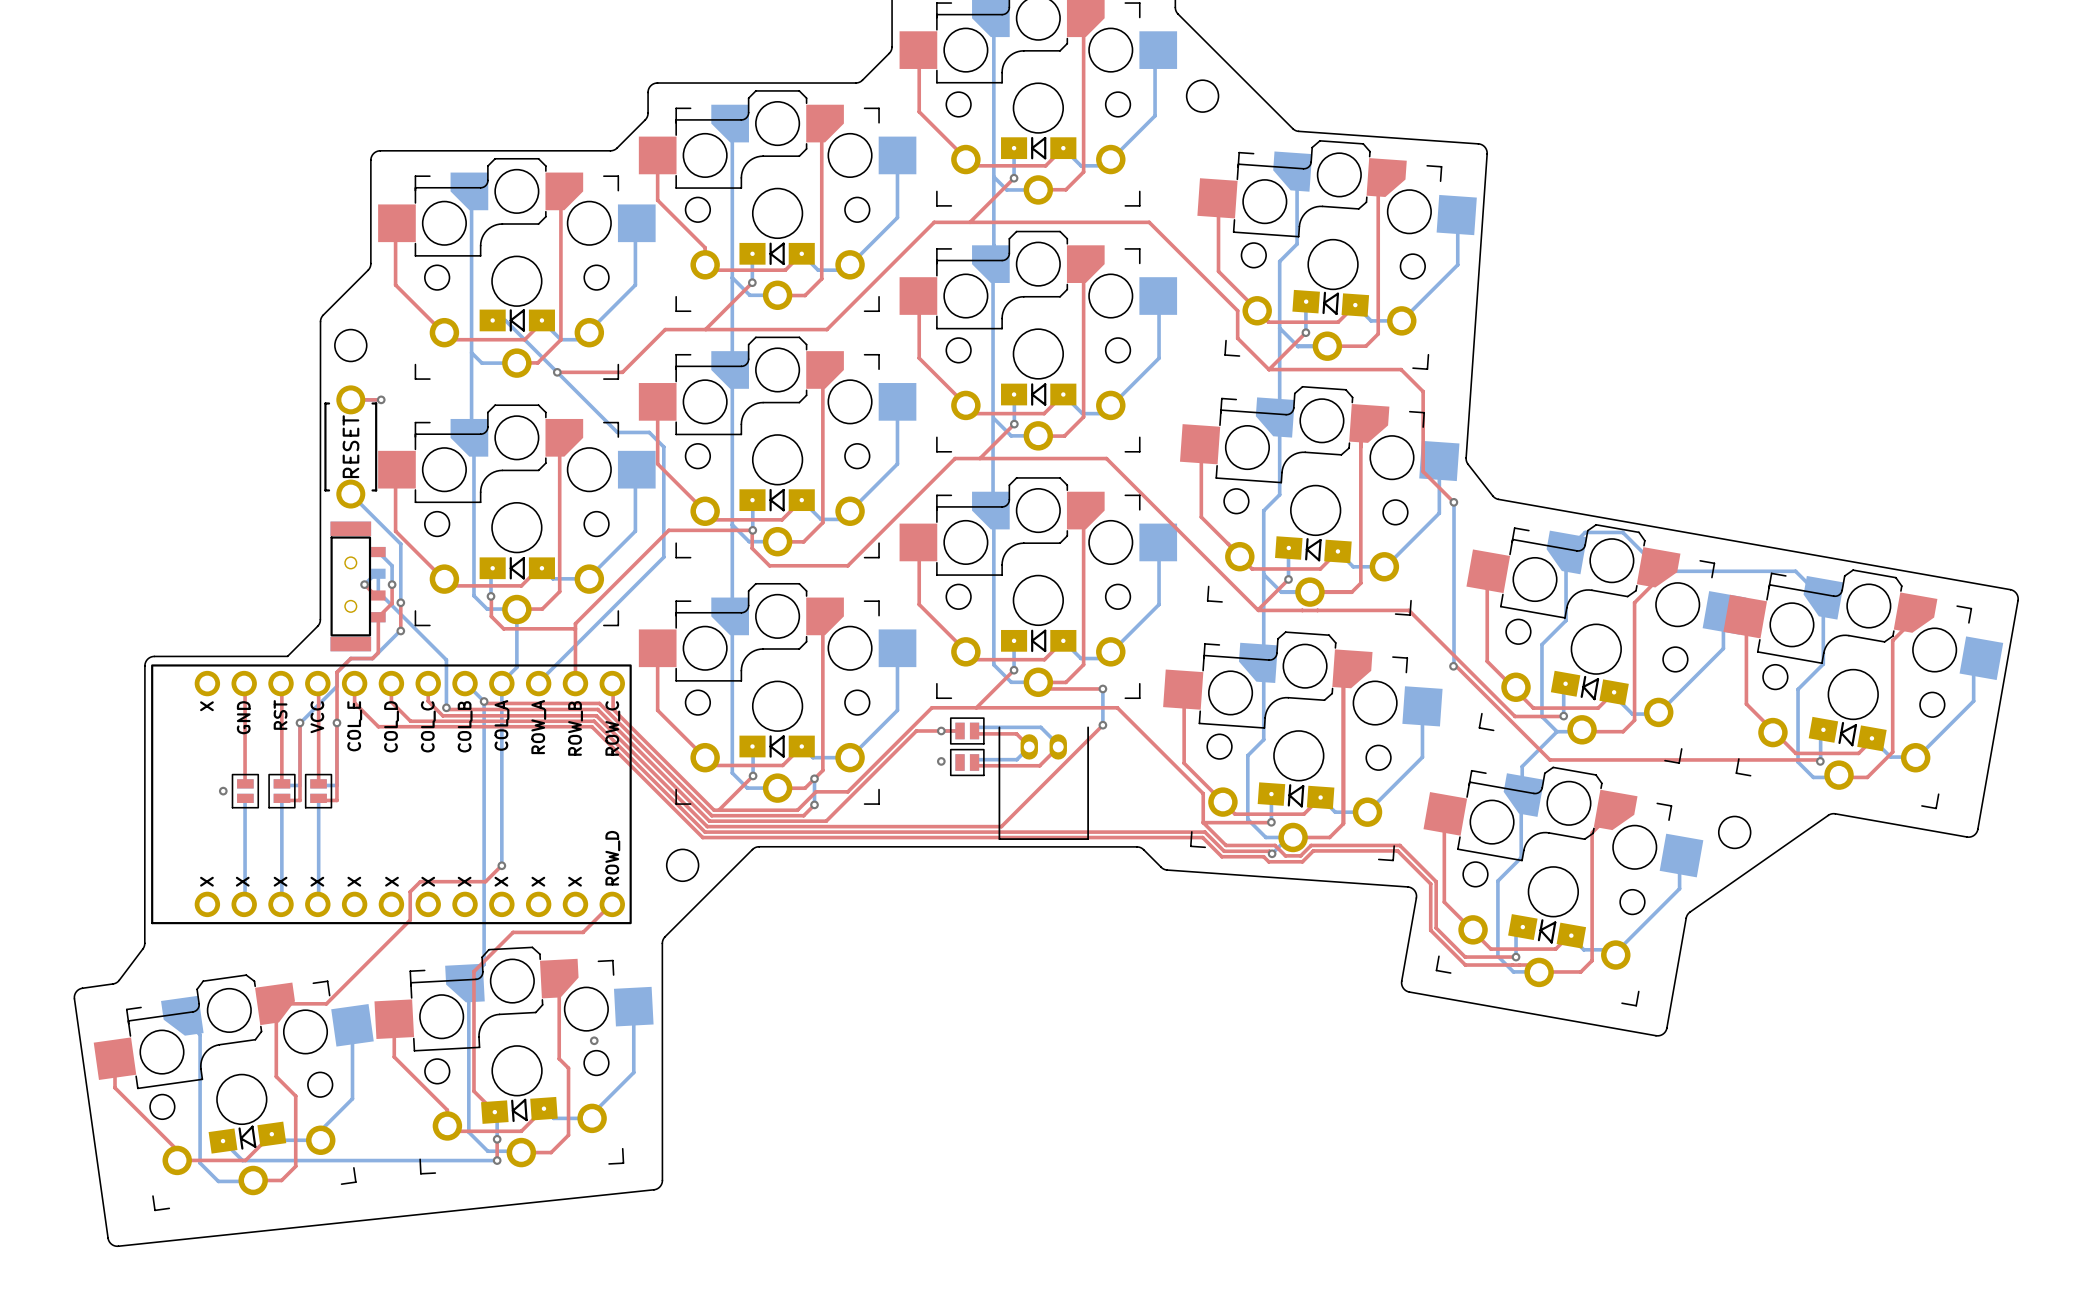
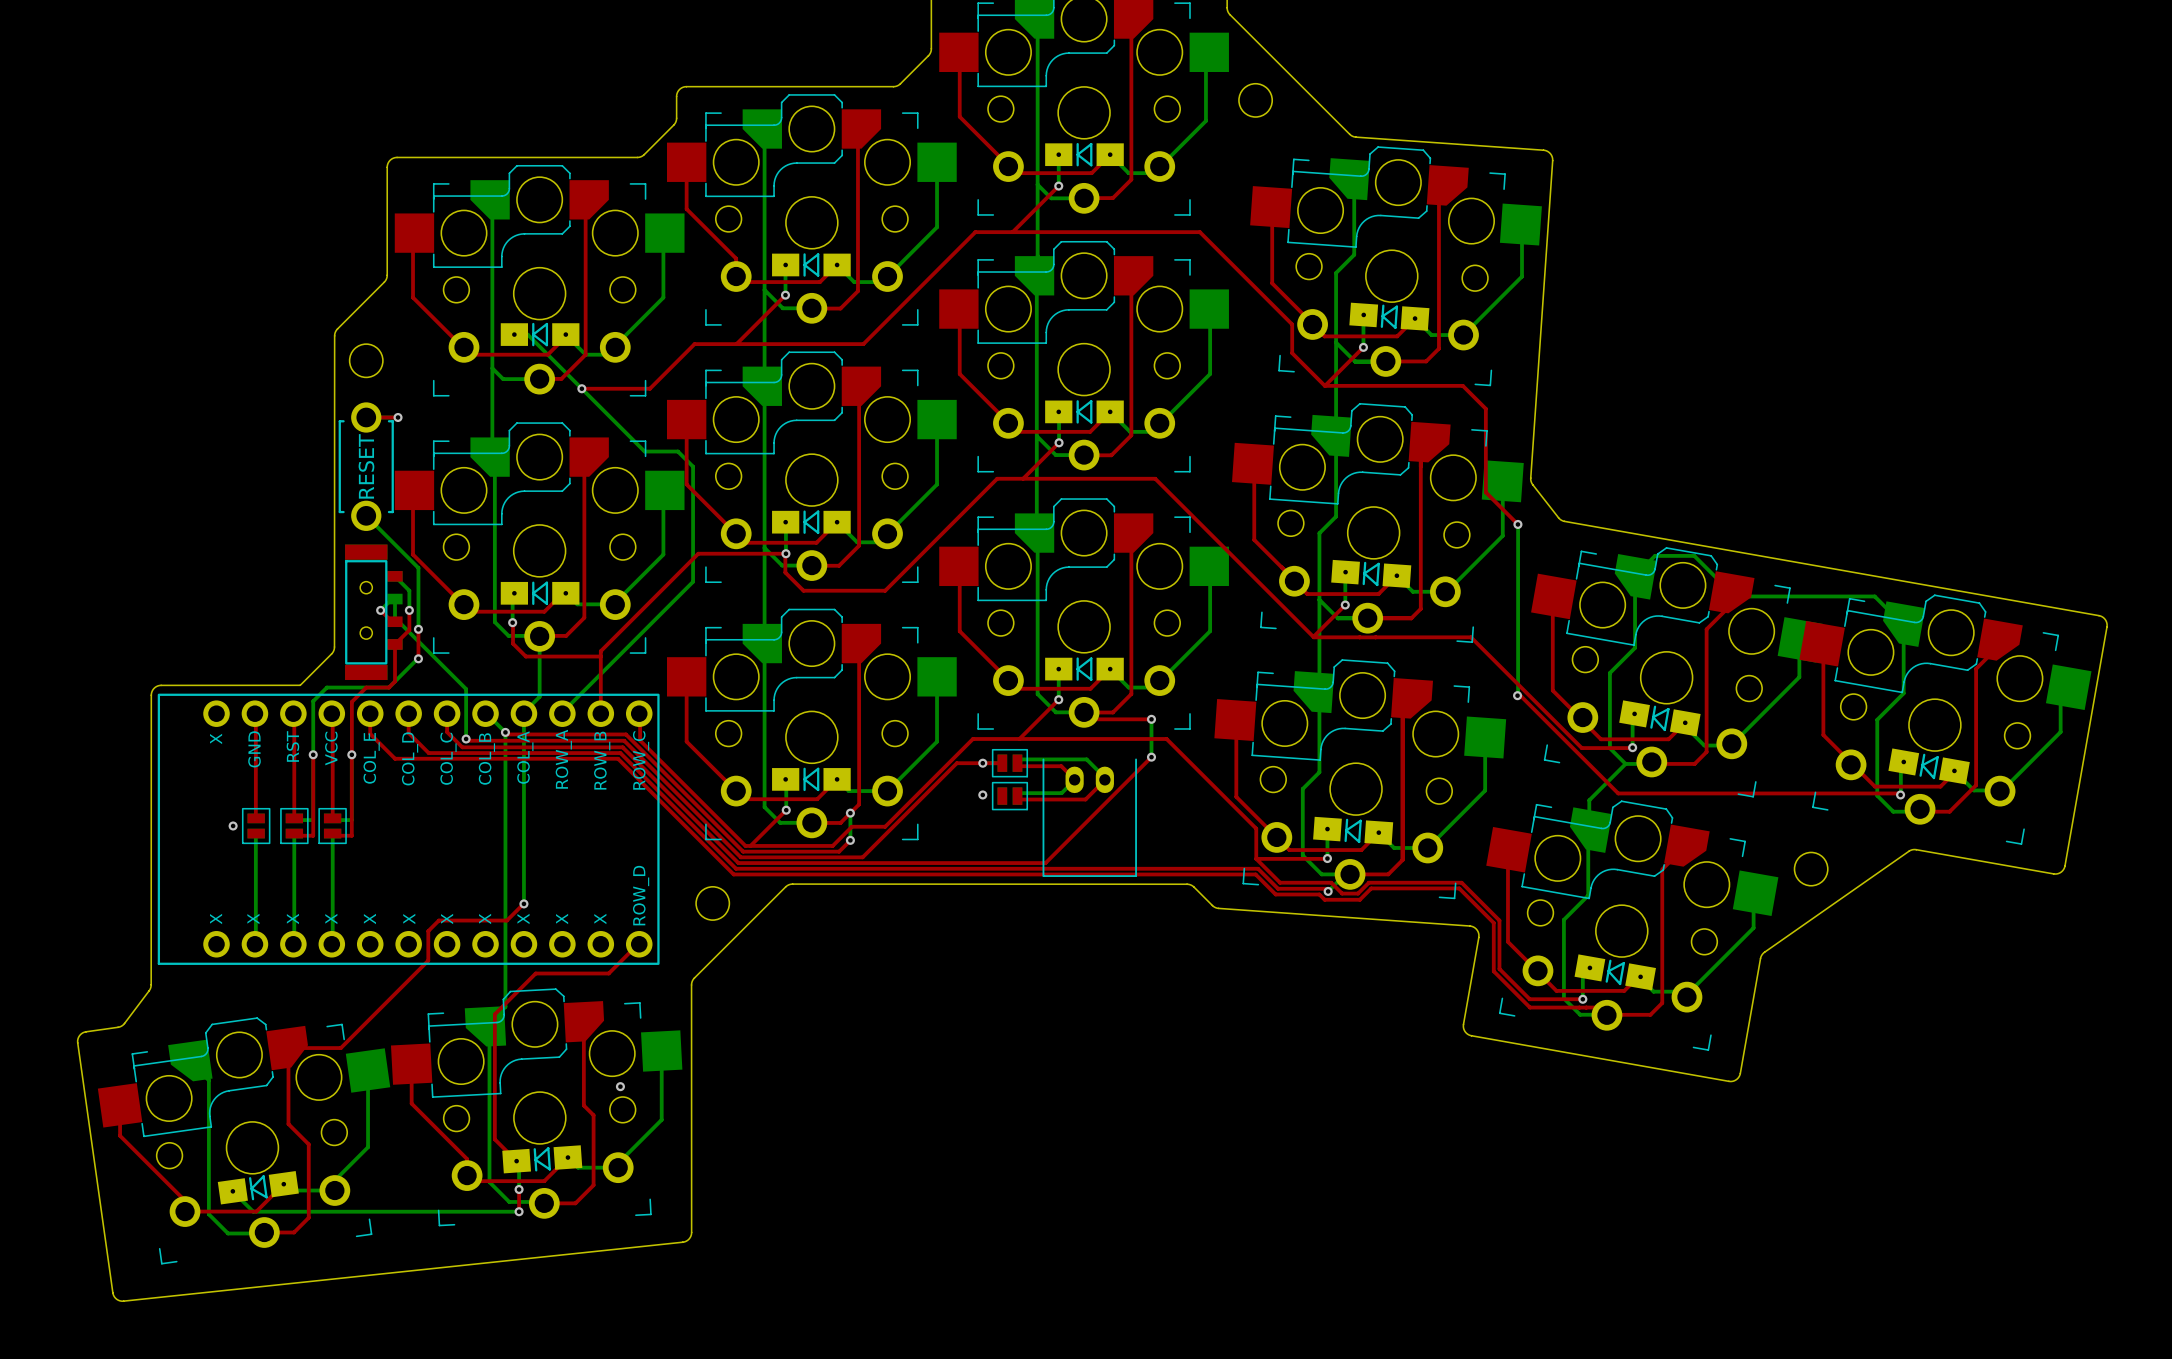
bottom track: (350, 658) (337, 672) (337, 686) (300, 722) -> (366, 687) (326, 687) (313, 701) (313, 754)

